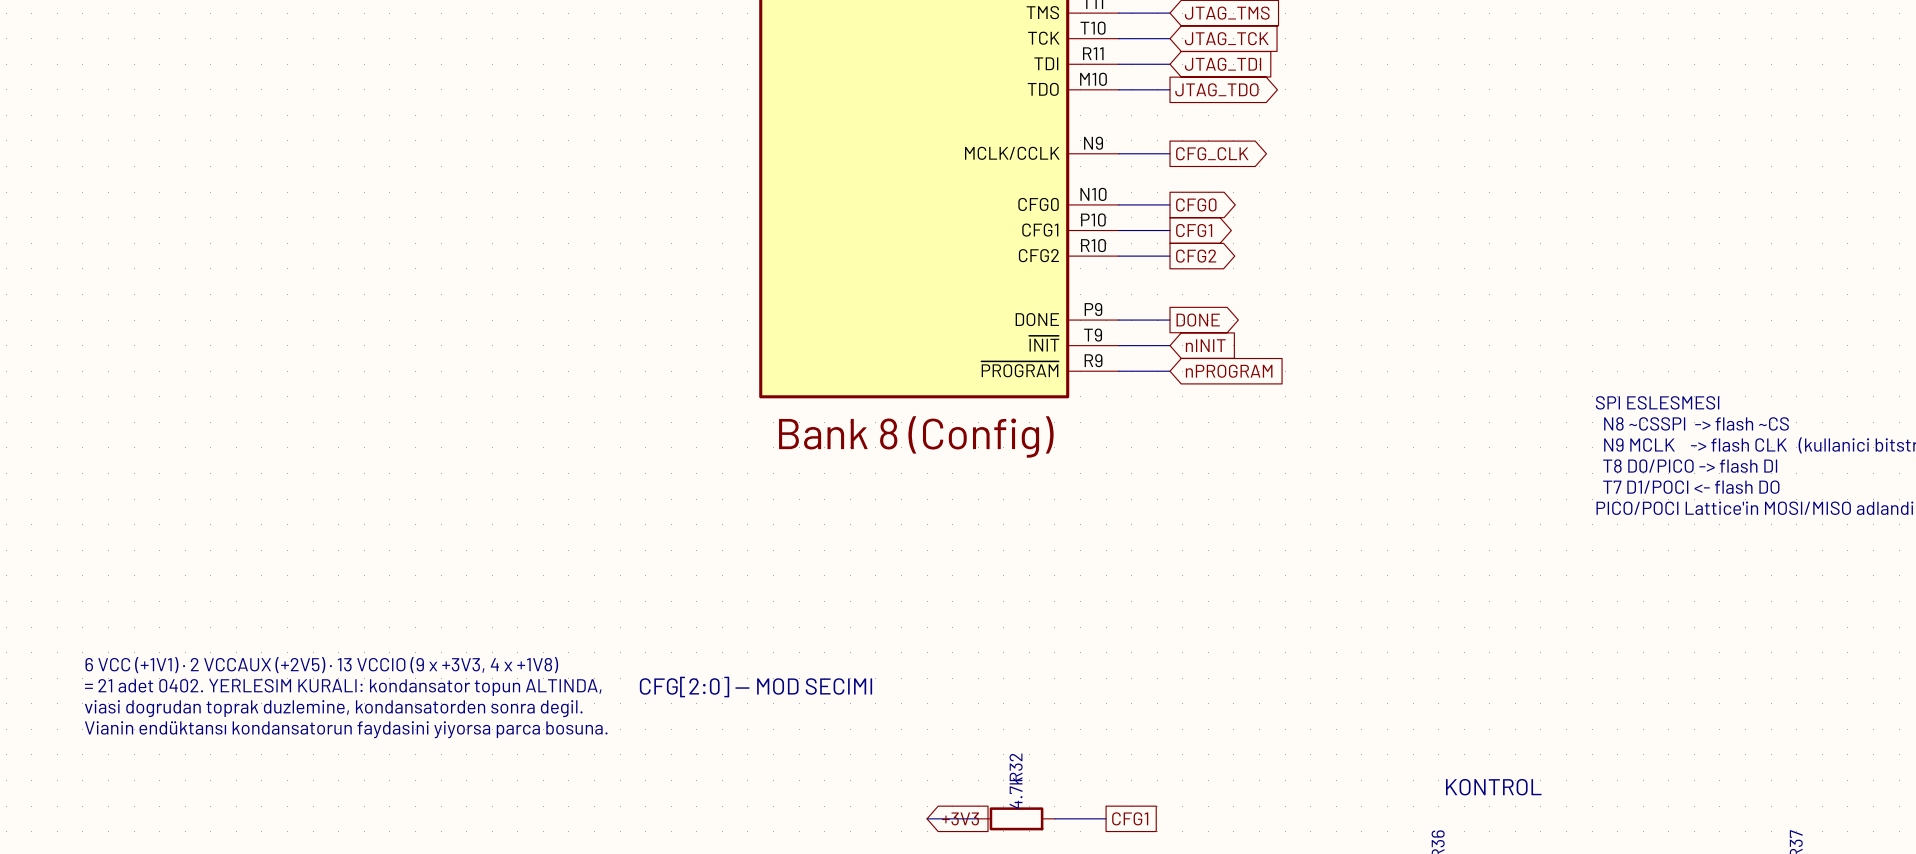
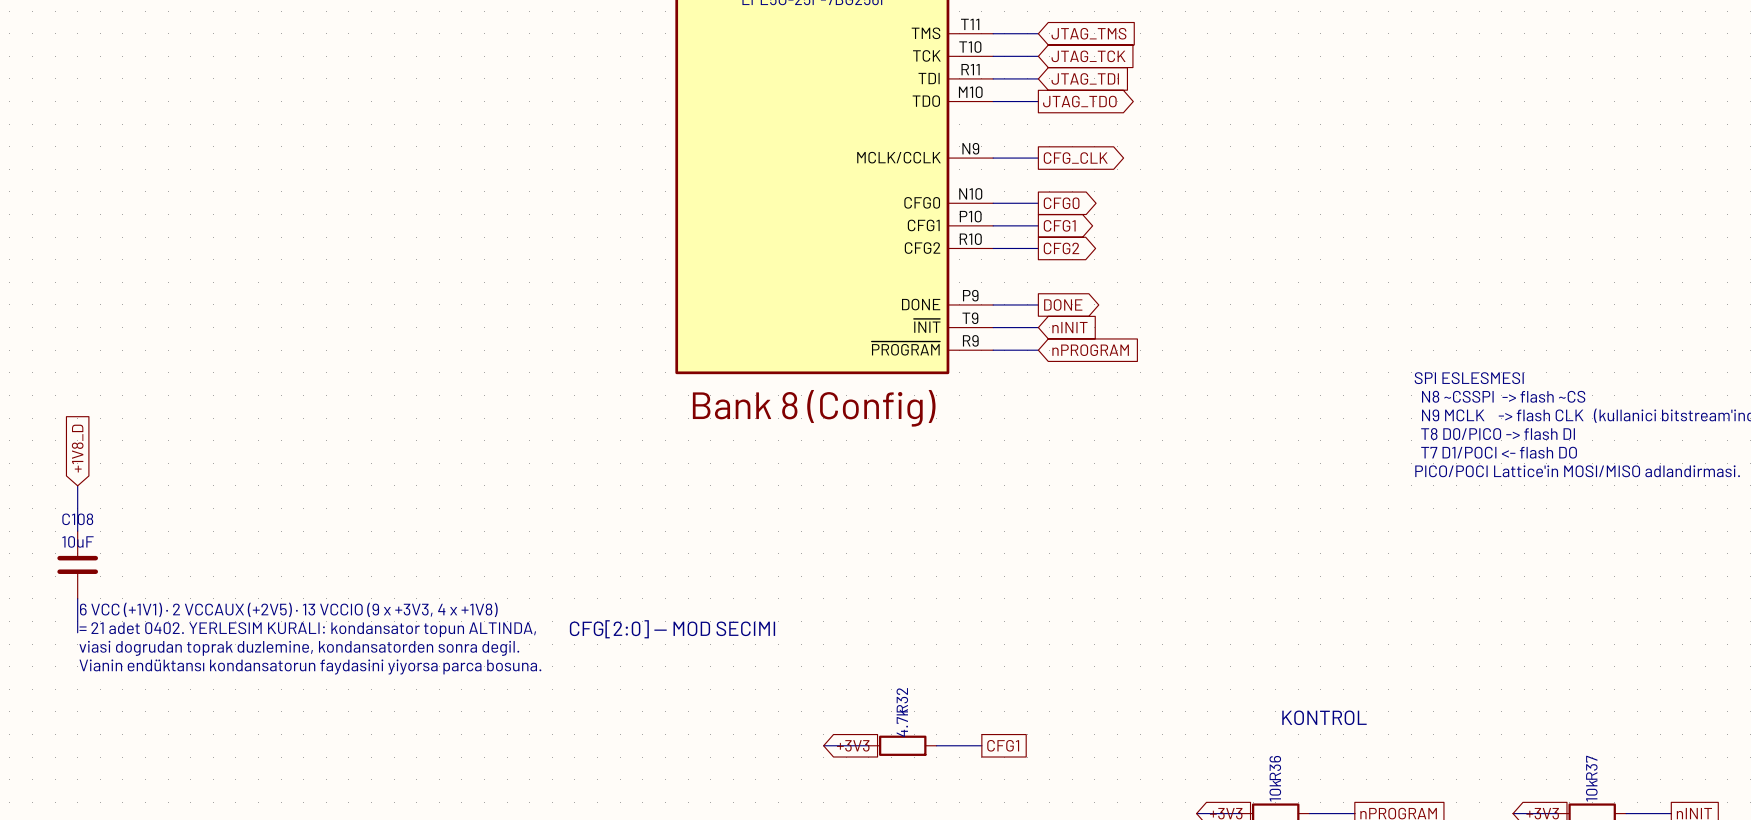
global label: none -> +1V8_D (77, 448)
wire: none -> (77, 485) (77, 531)
C108: none -> 10uF (77, 564)
wire: none -> (77, 598) (77, 632)

